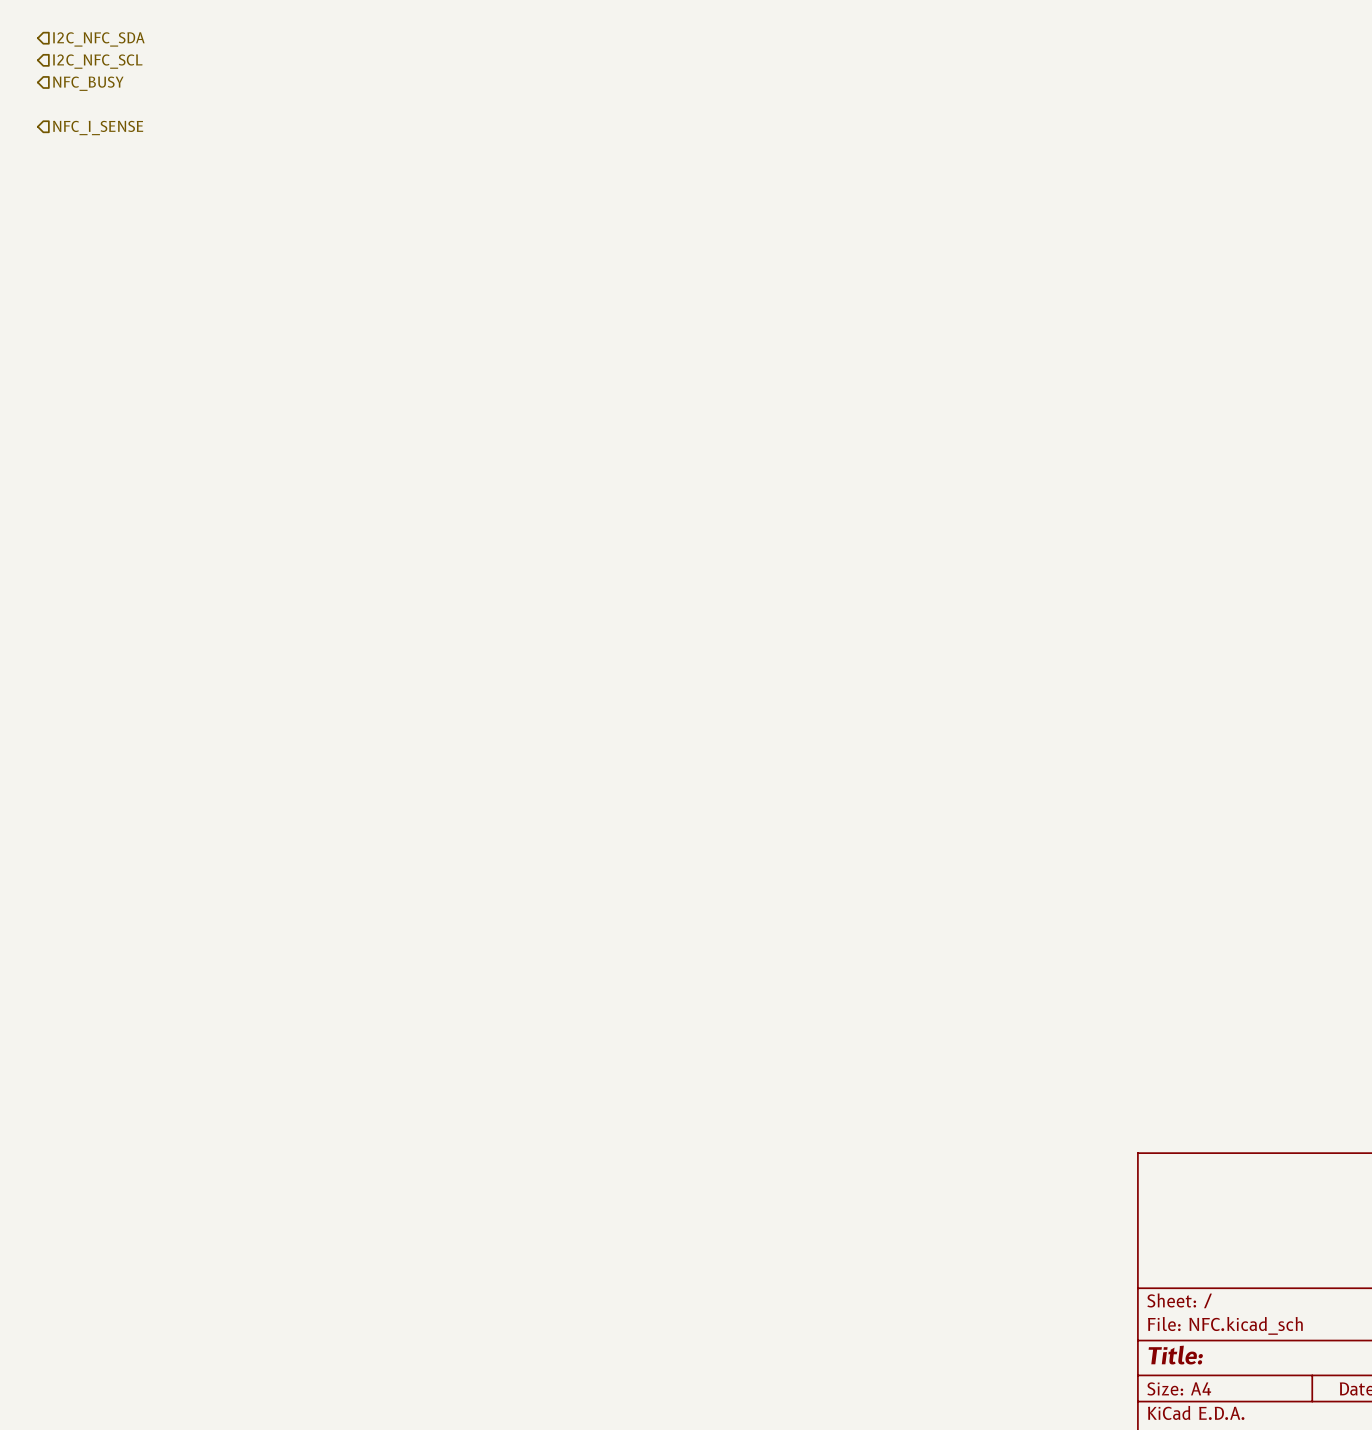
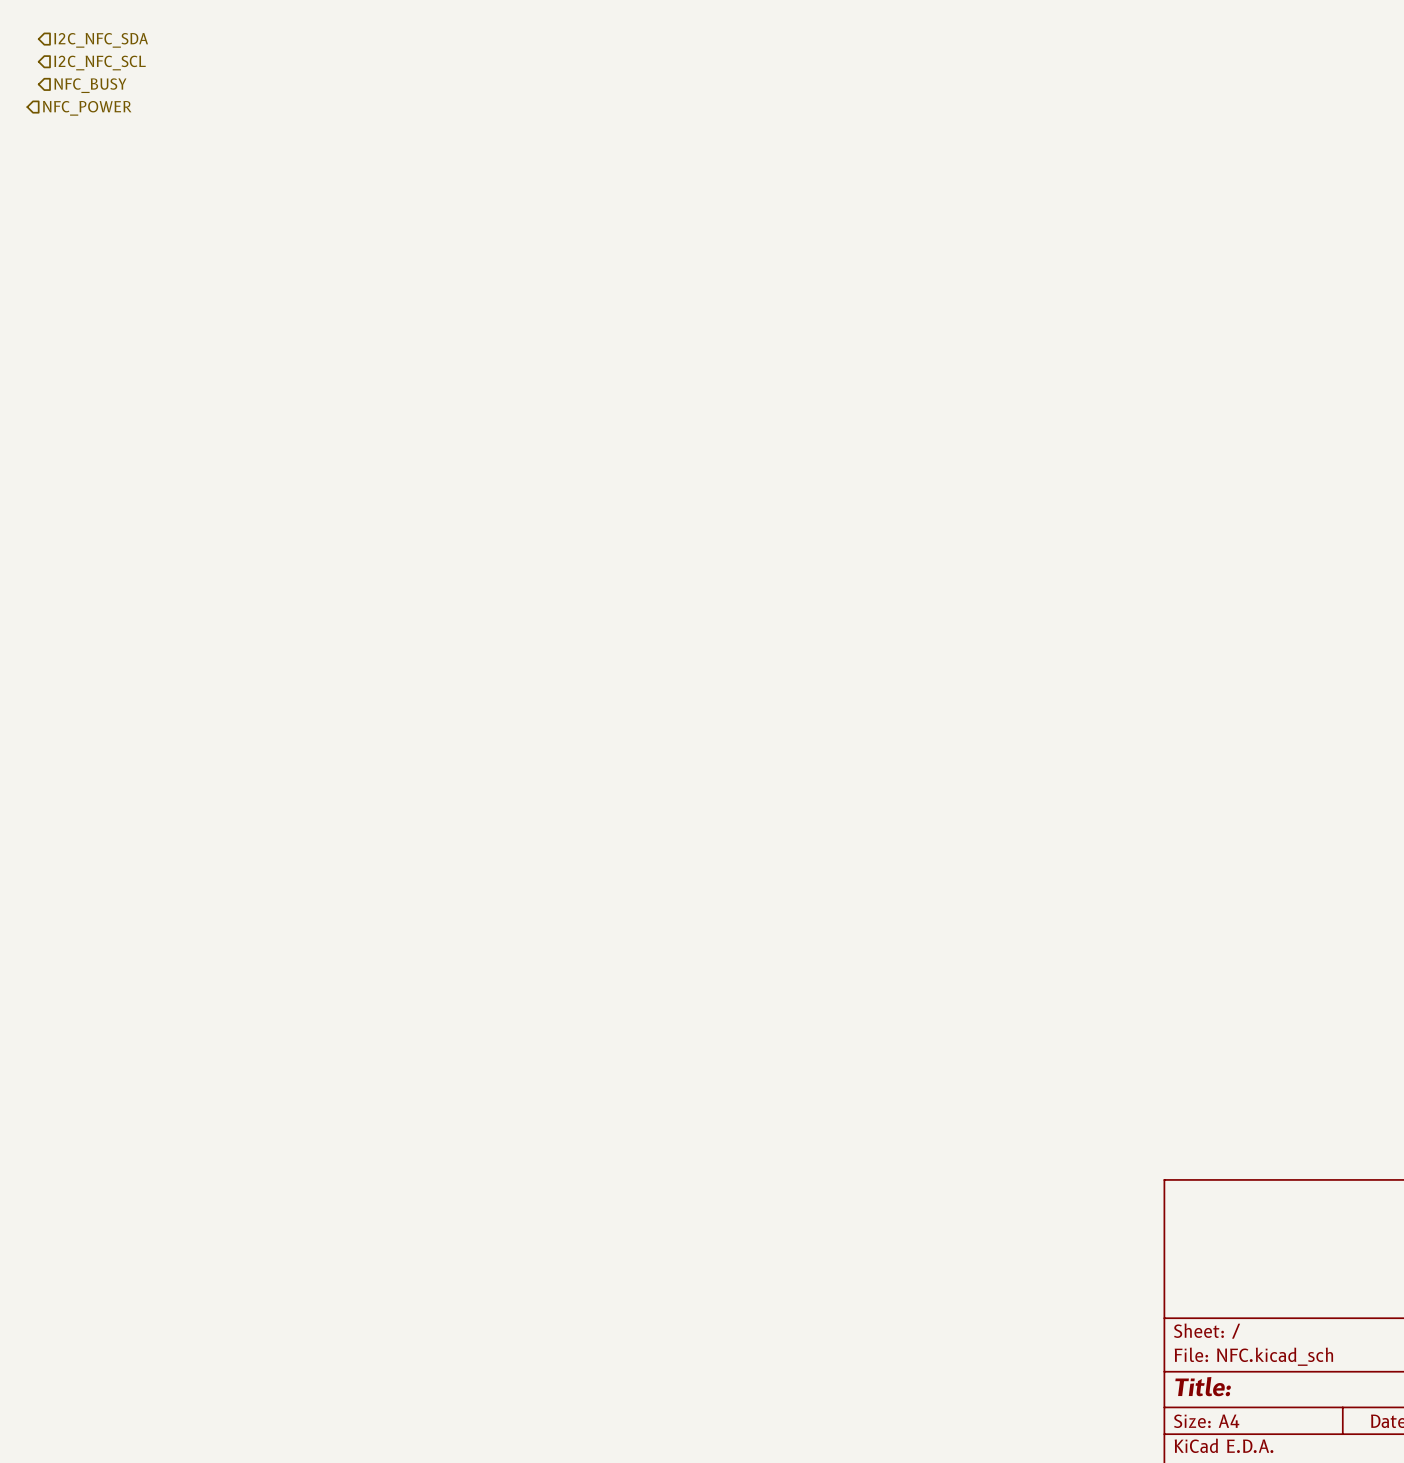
hierarchical label: none -> NFC_POWER (87, 108)
hierarchical label: NFC_I_SENSE (98, 128) -> none

